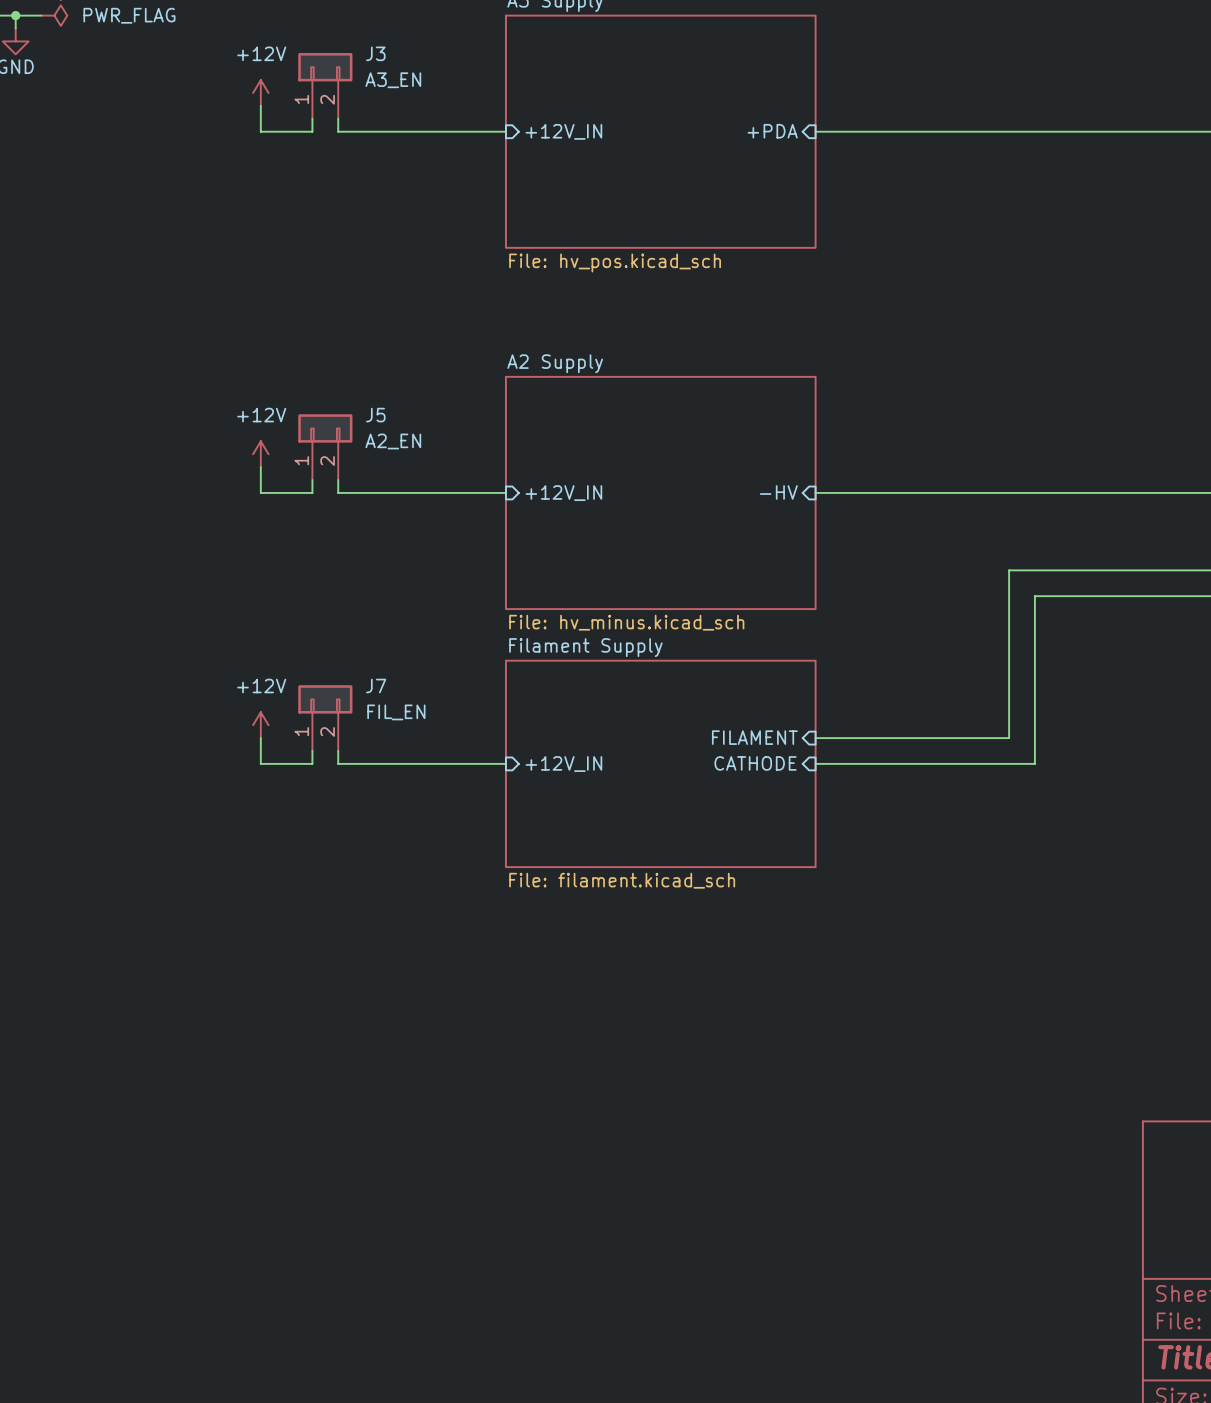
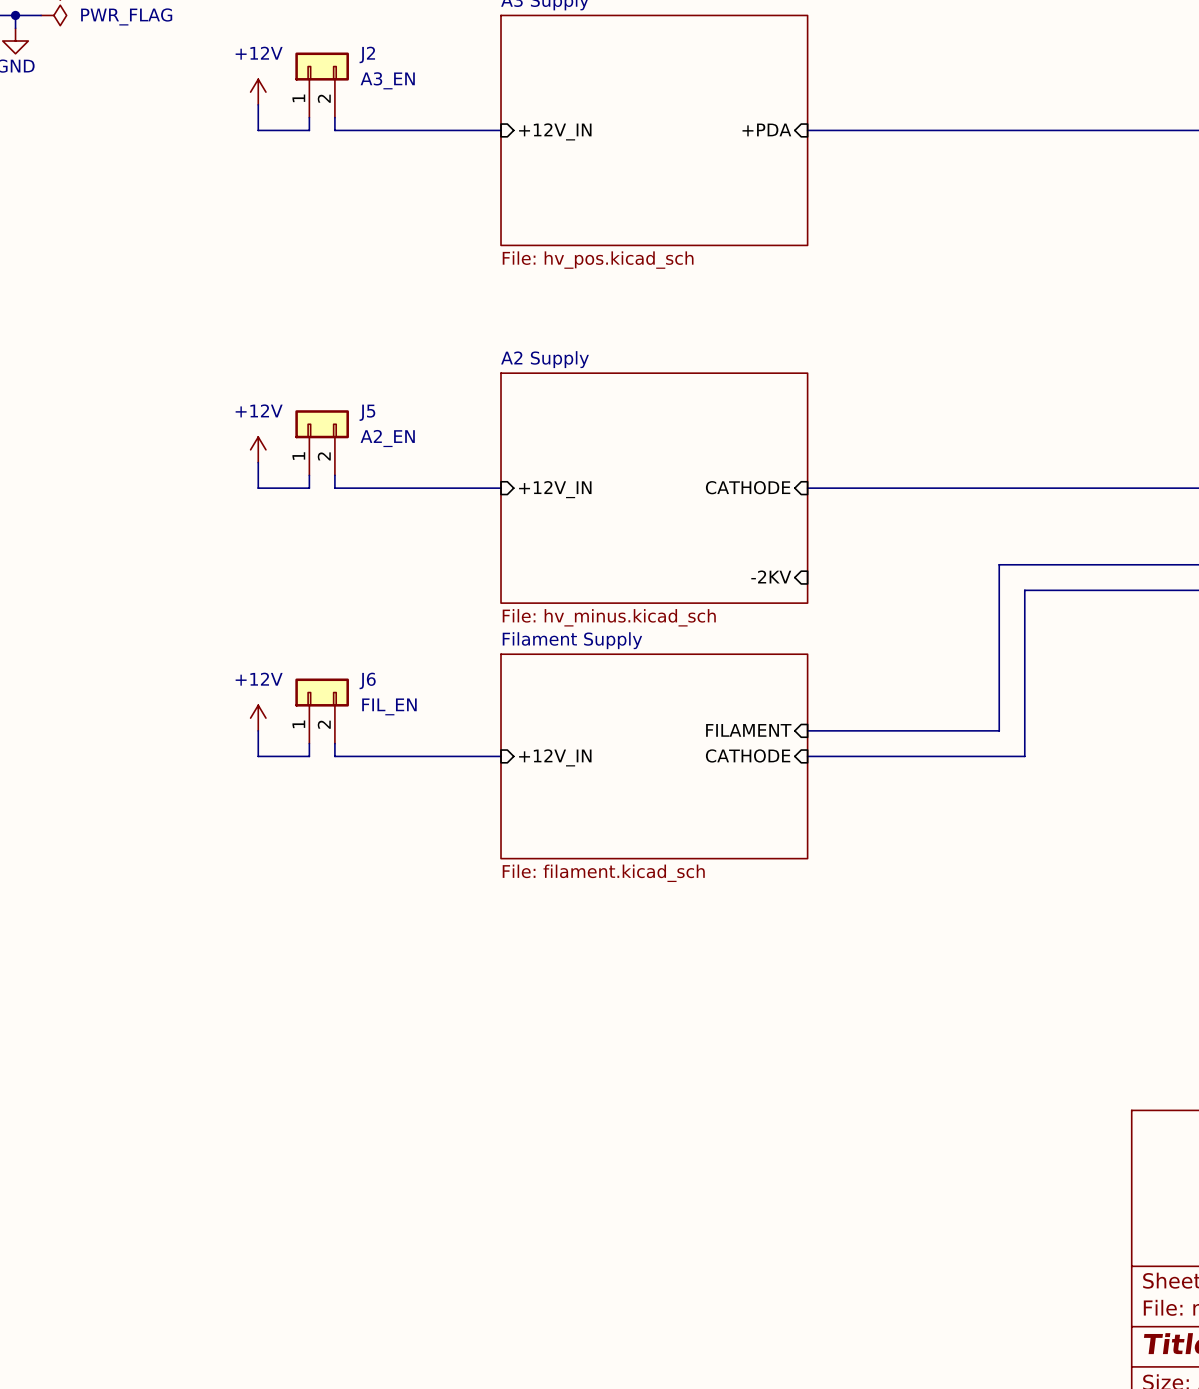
J3 name: J3 (375, 53) -> J2 (367, 54)
sheet pin: -HV (778, 492) -> CATHODE (748, 487)
sheet pin: none -> -2KV (771, 576)
J7 name: J7 (376, 686) -> J6 (367, 680)

